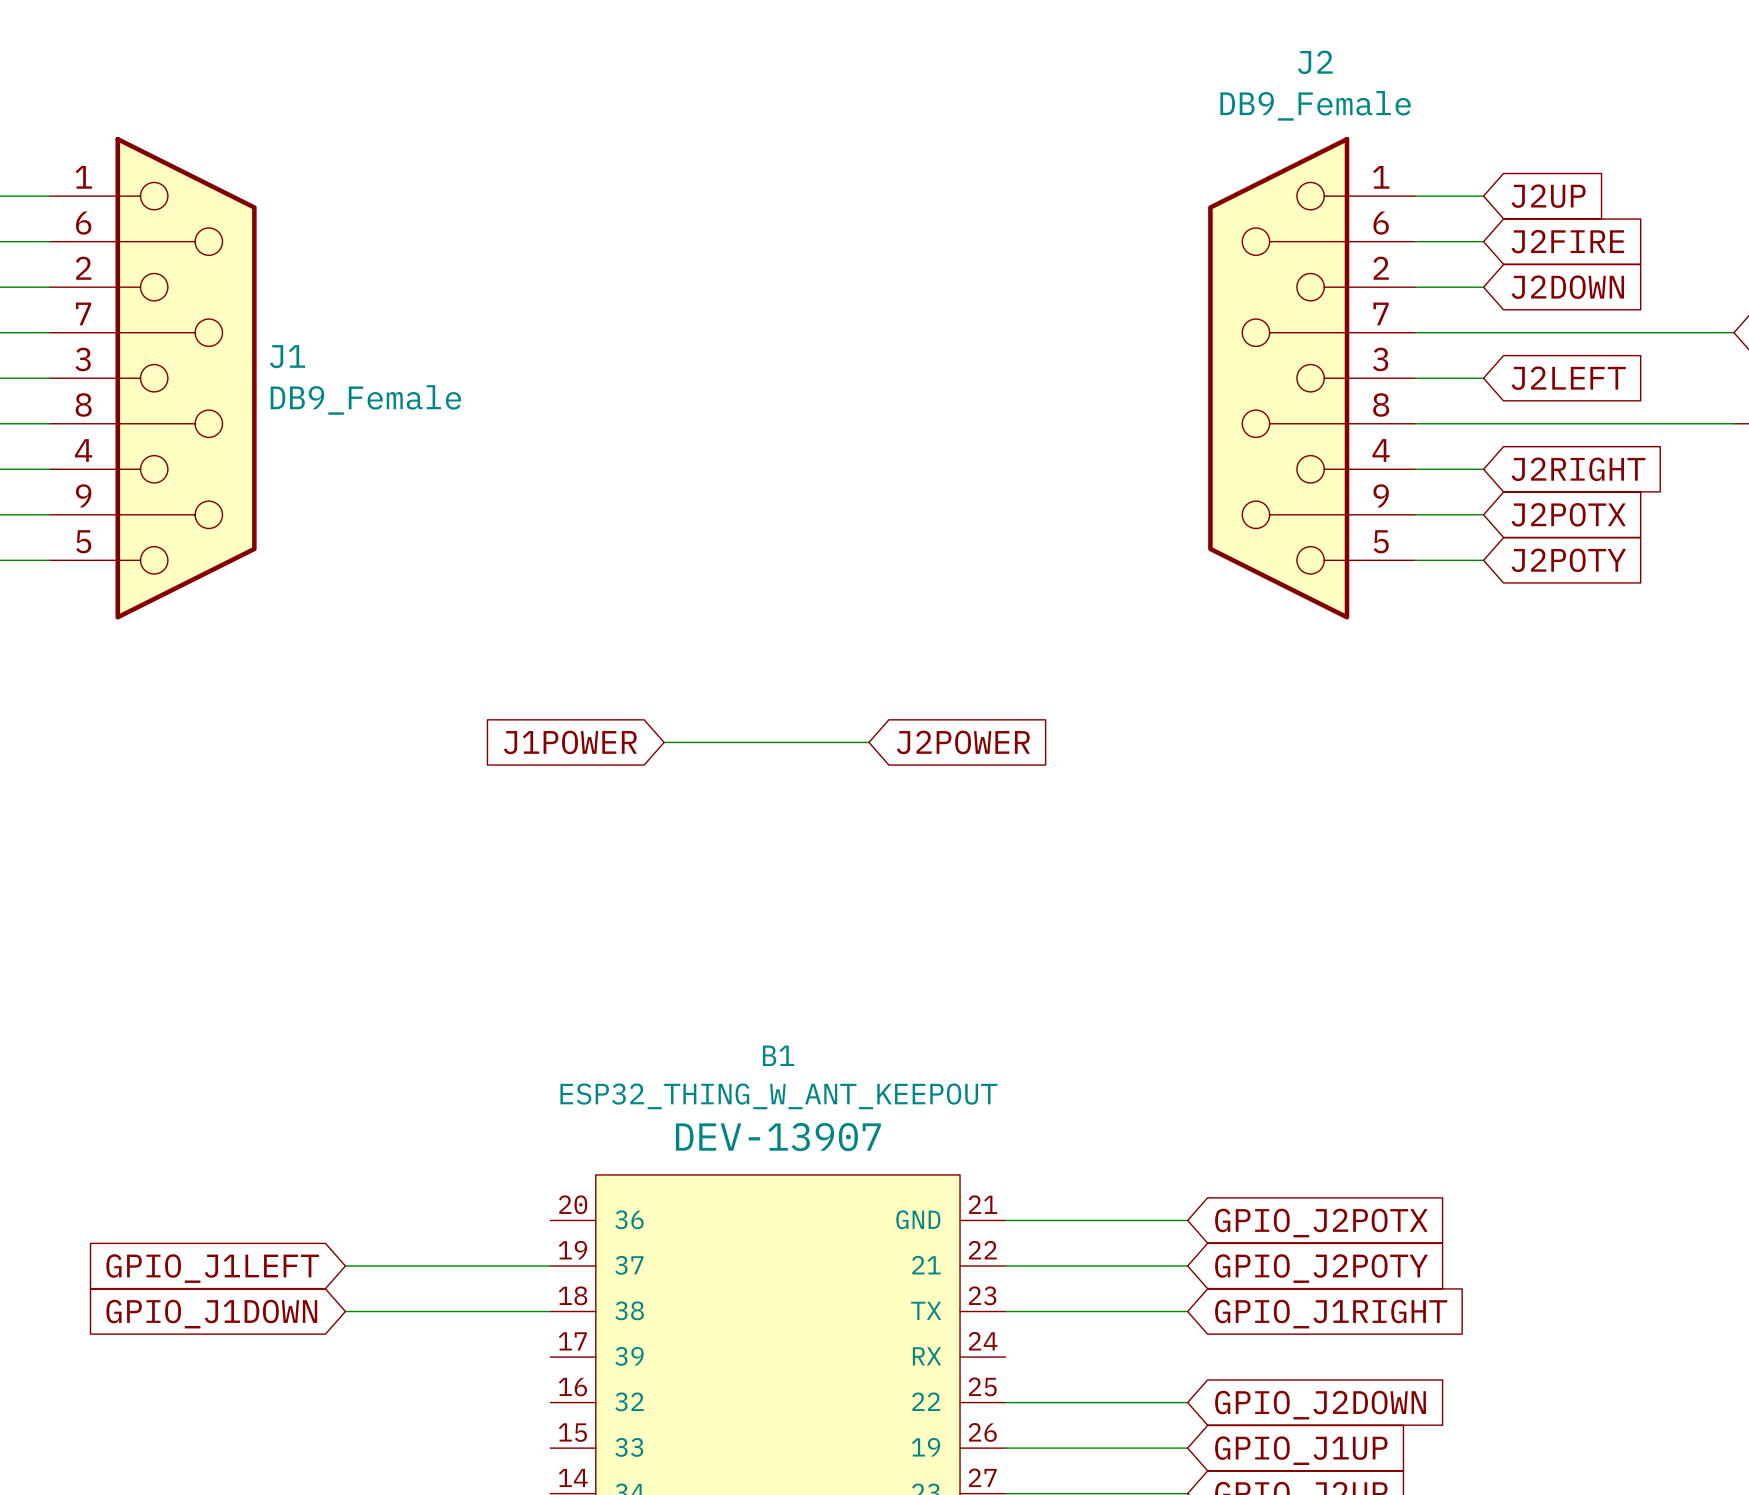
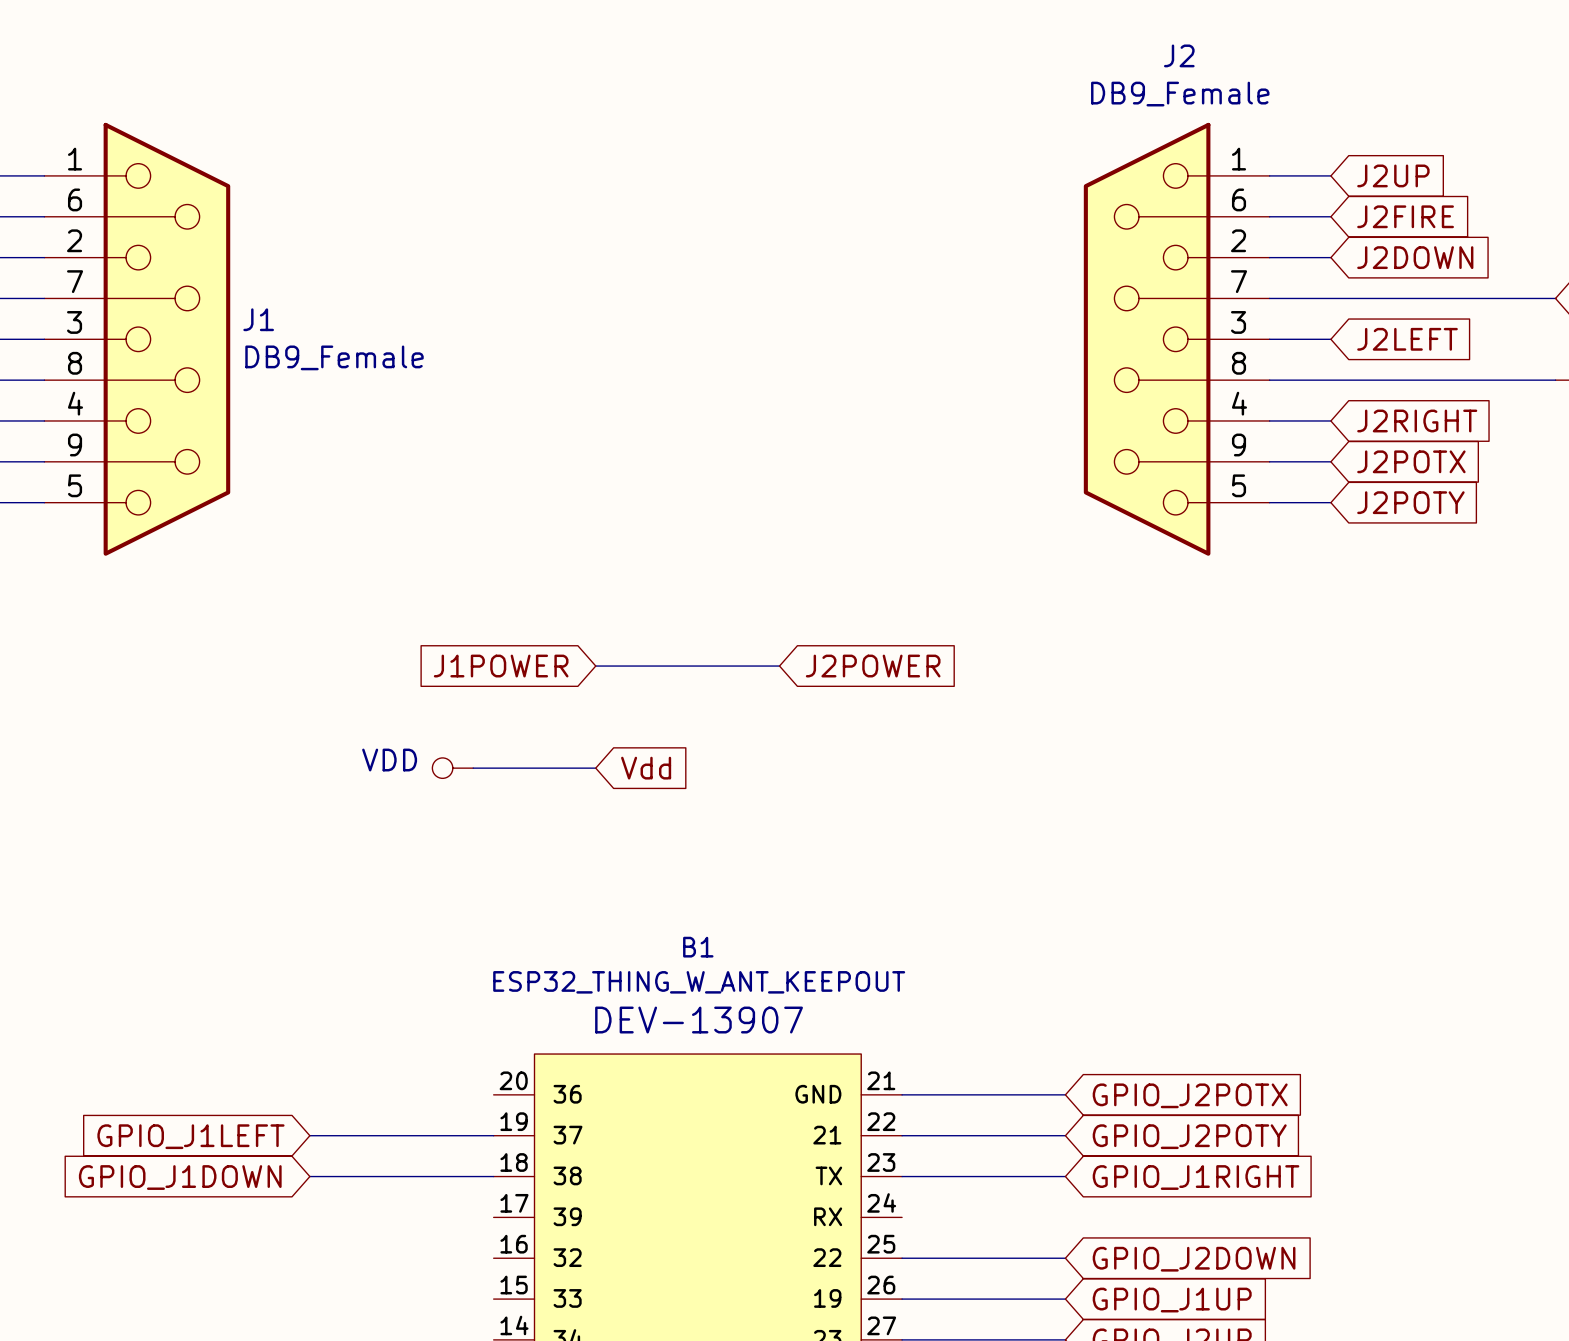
global label: none -> Vdd (646, 768)
power symbol: none -> VDD (452, 768)
wire: none -> (473, 768) (595, 768)

